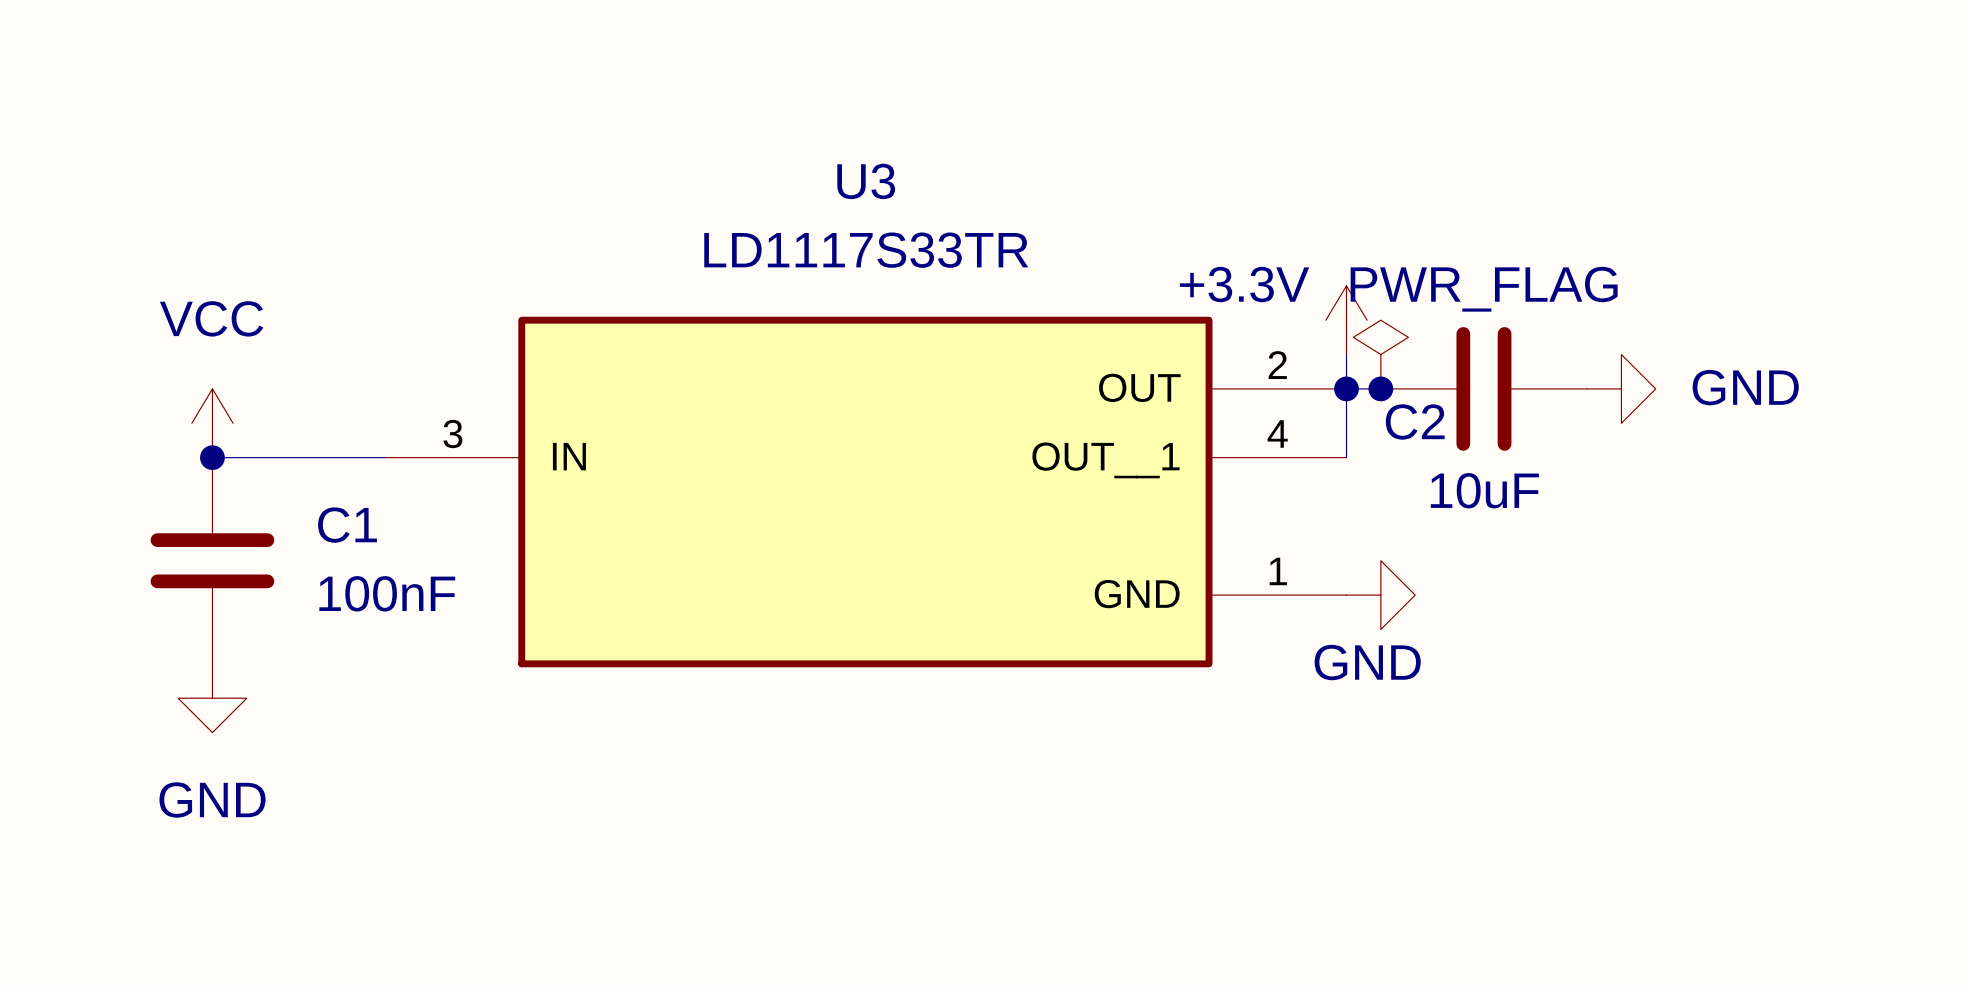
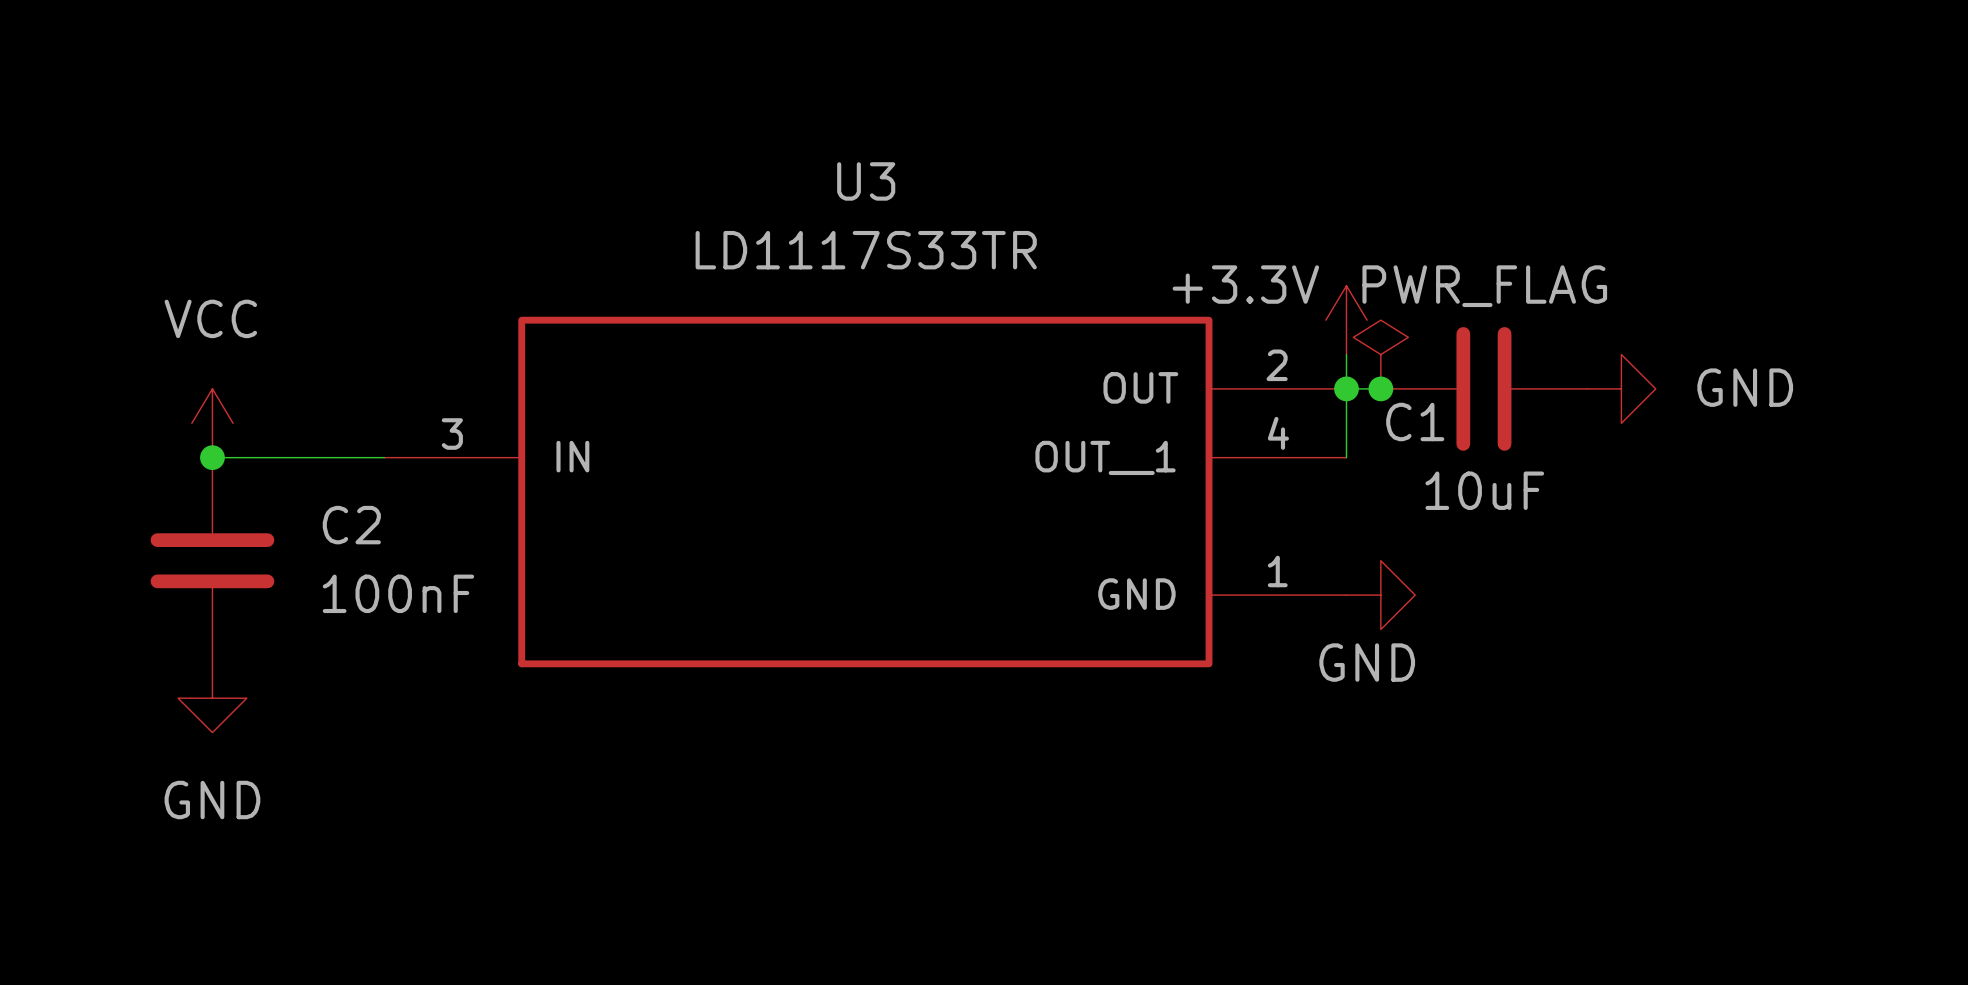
C2 name: C2 (1415, 421) -> C1 (1415, 422)
C1 name: C1 (347, 525) -> C2 (351, 525)

